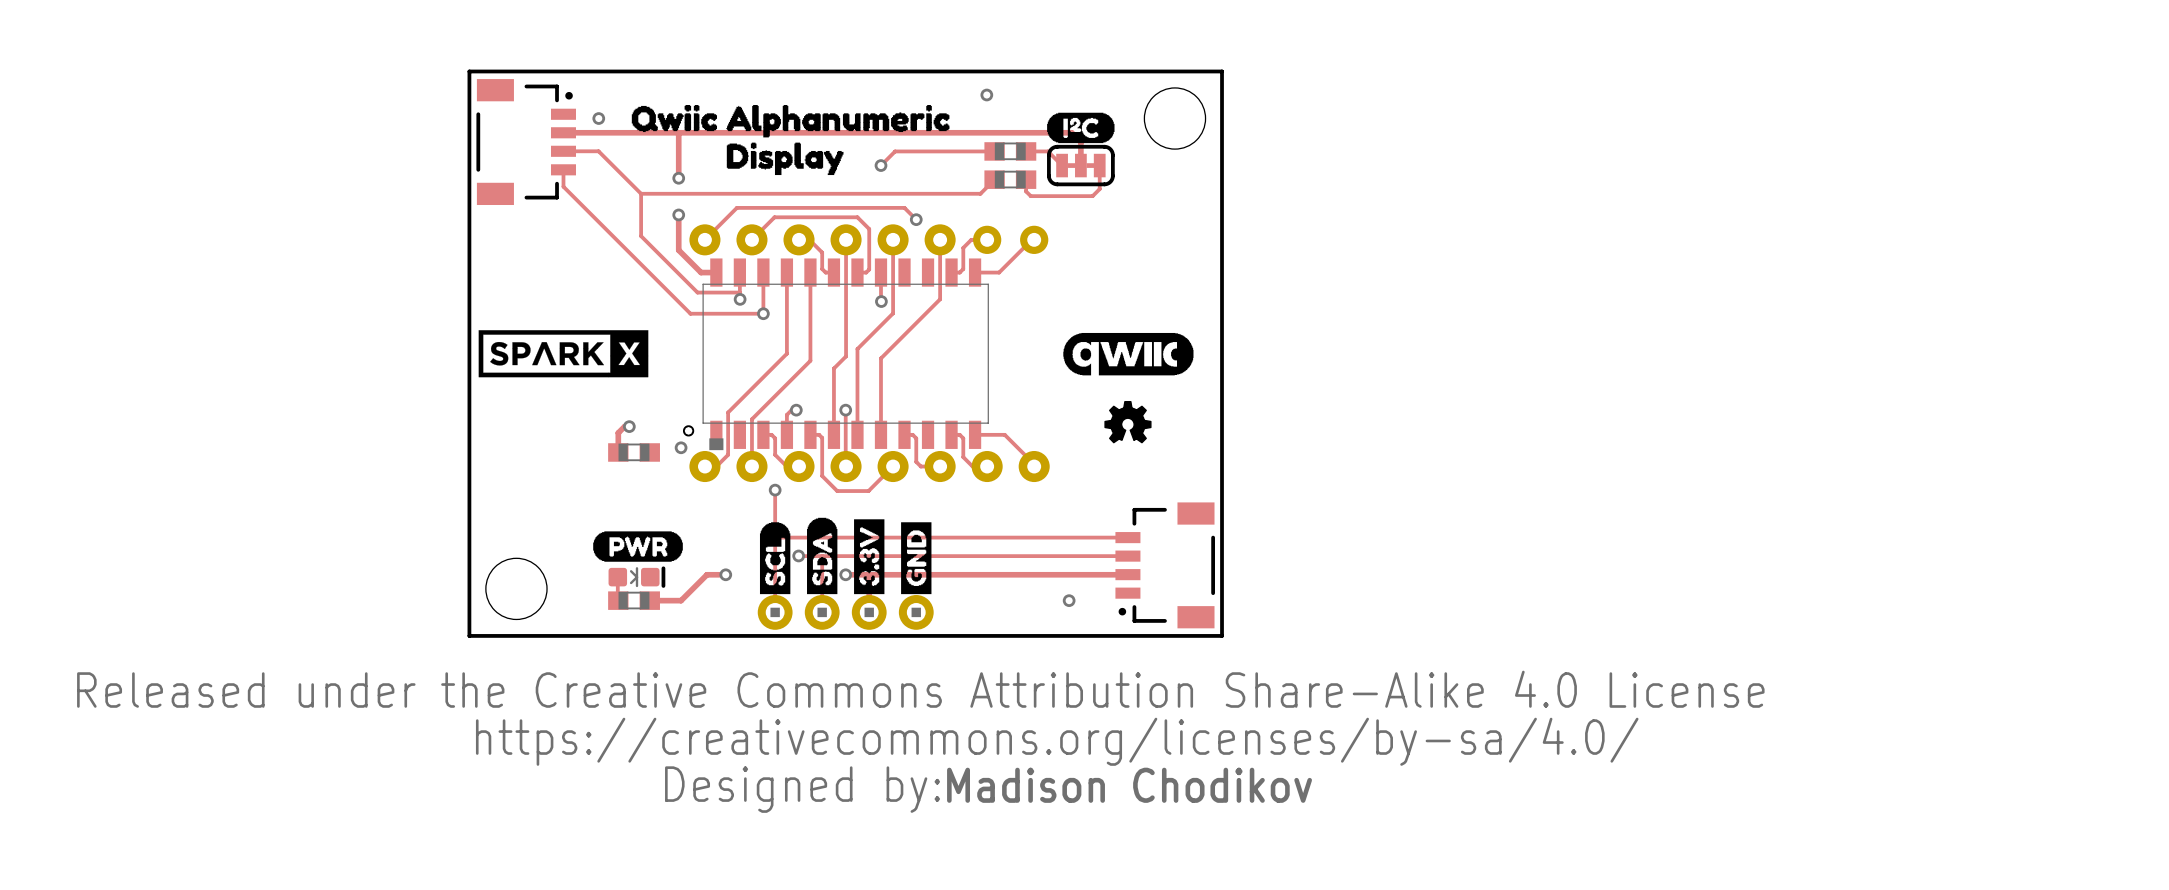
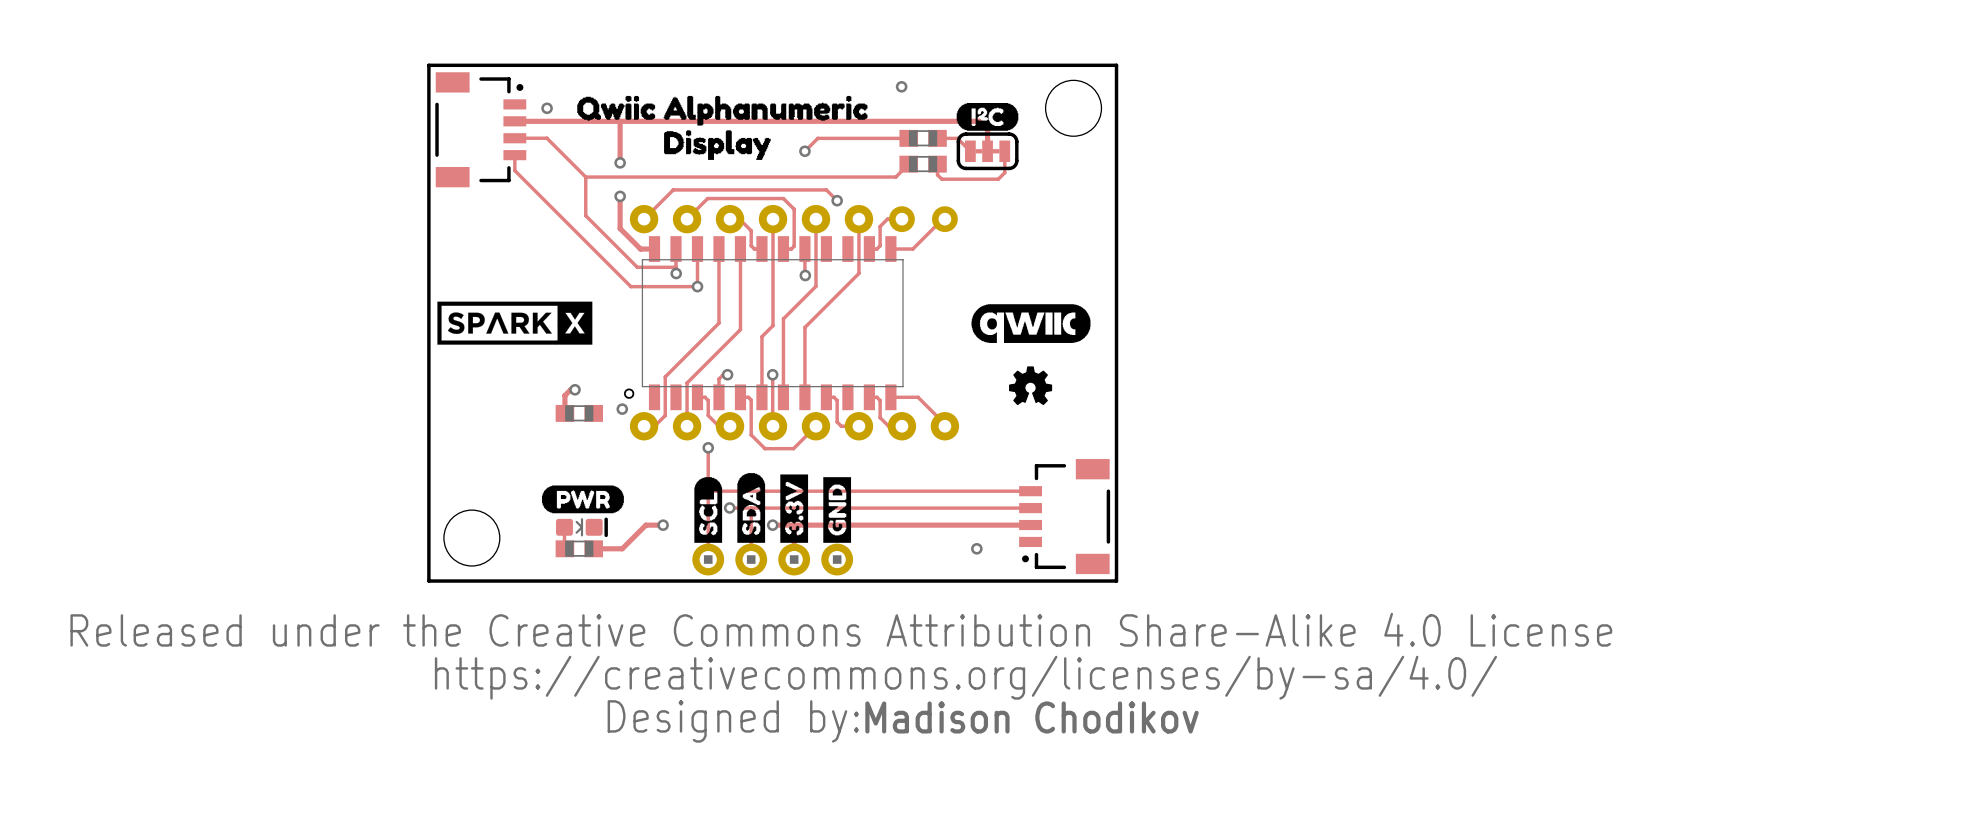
drawing: [709, 438, 724, 451] -> none

